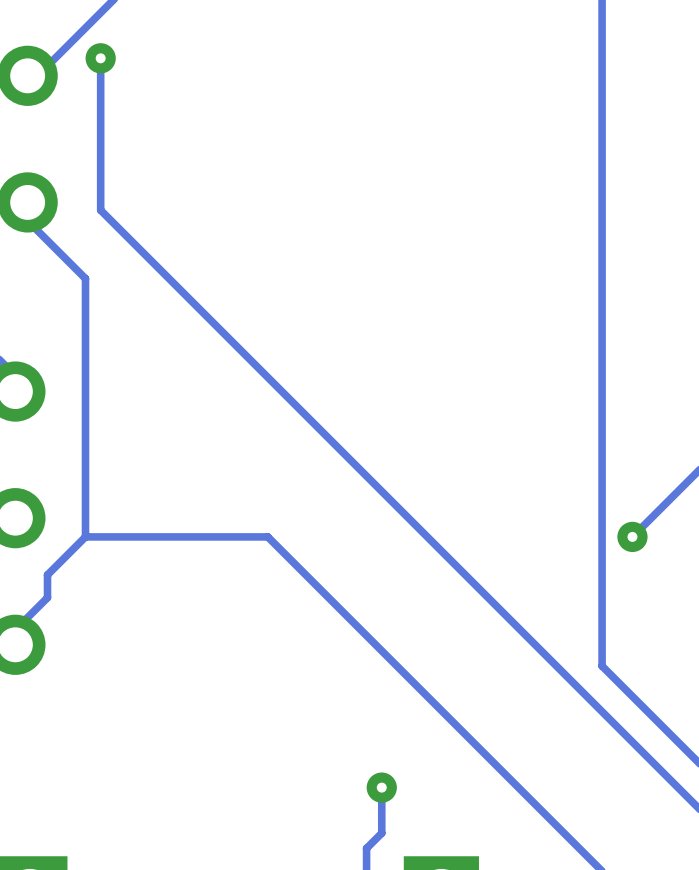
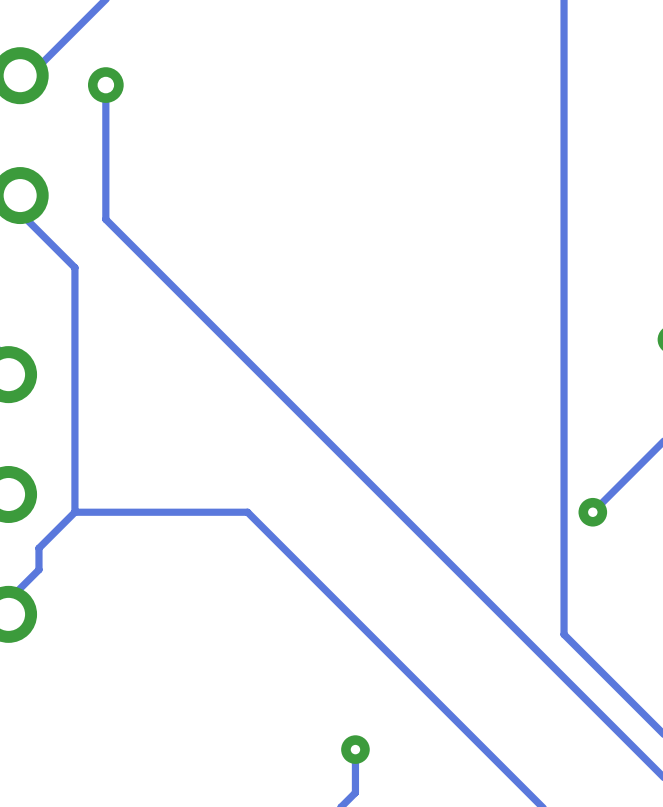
track: (100, 58) (100, 210) (118, 227) -> (105, 85) (105, 219)
via position: (100, 58) -> (105, 85)

